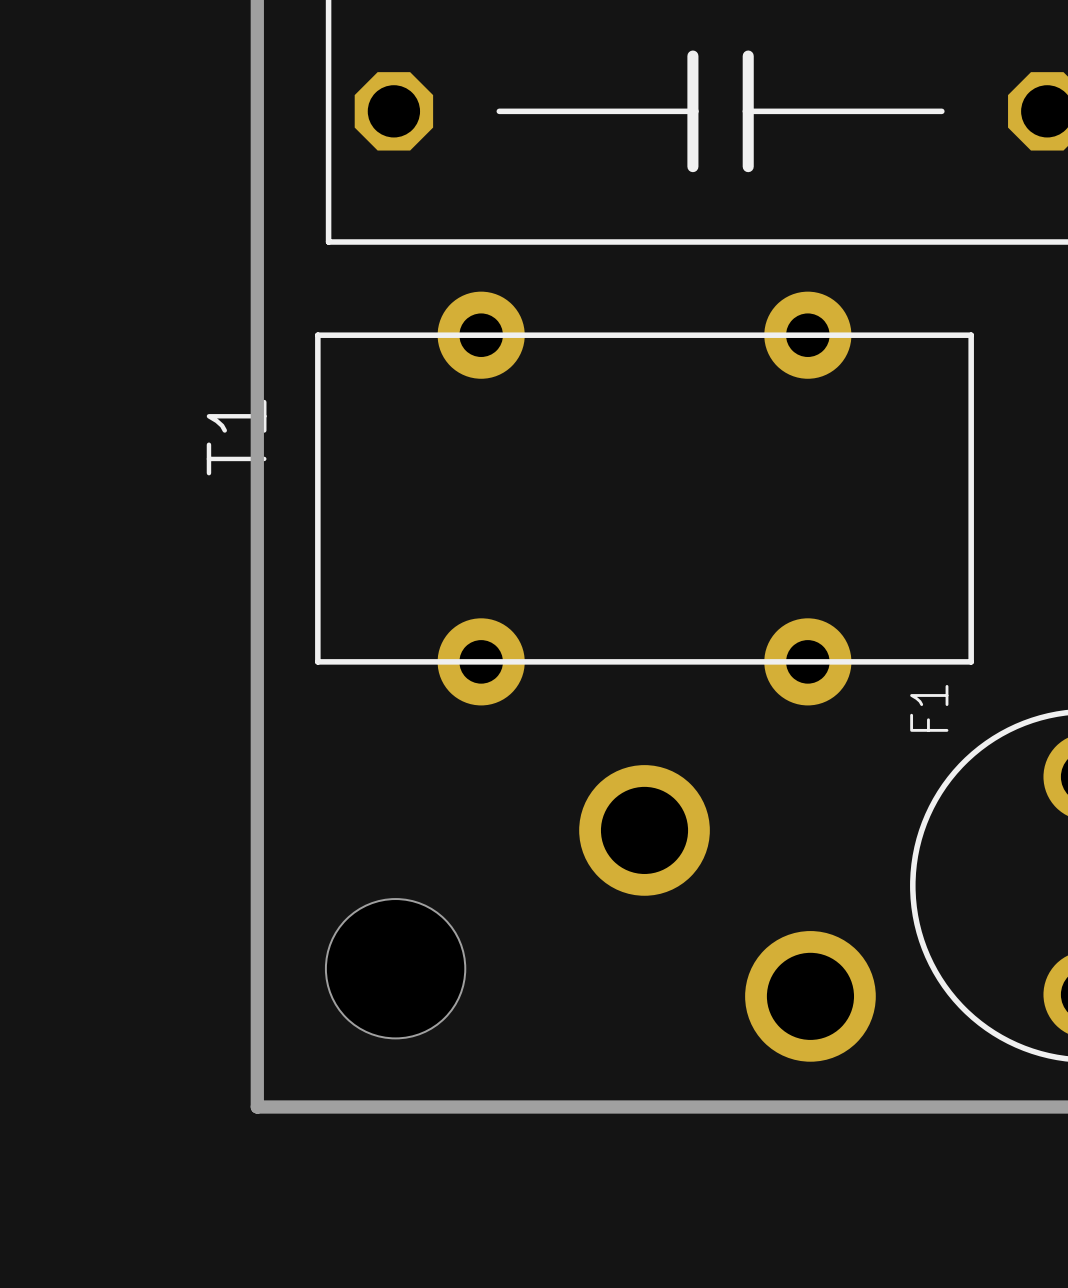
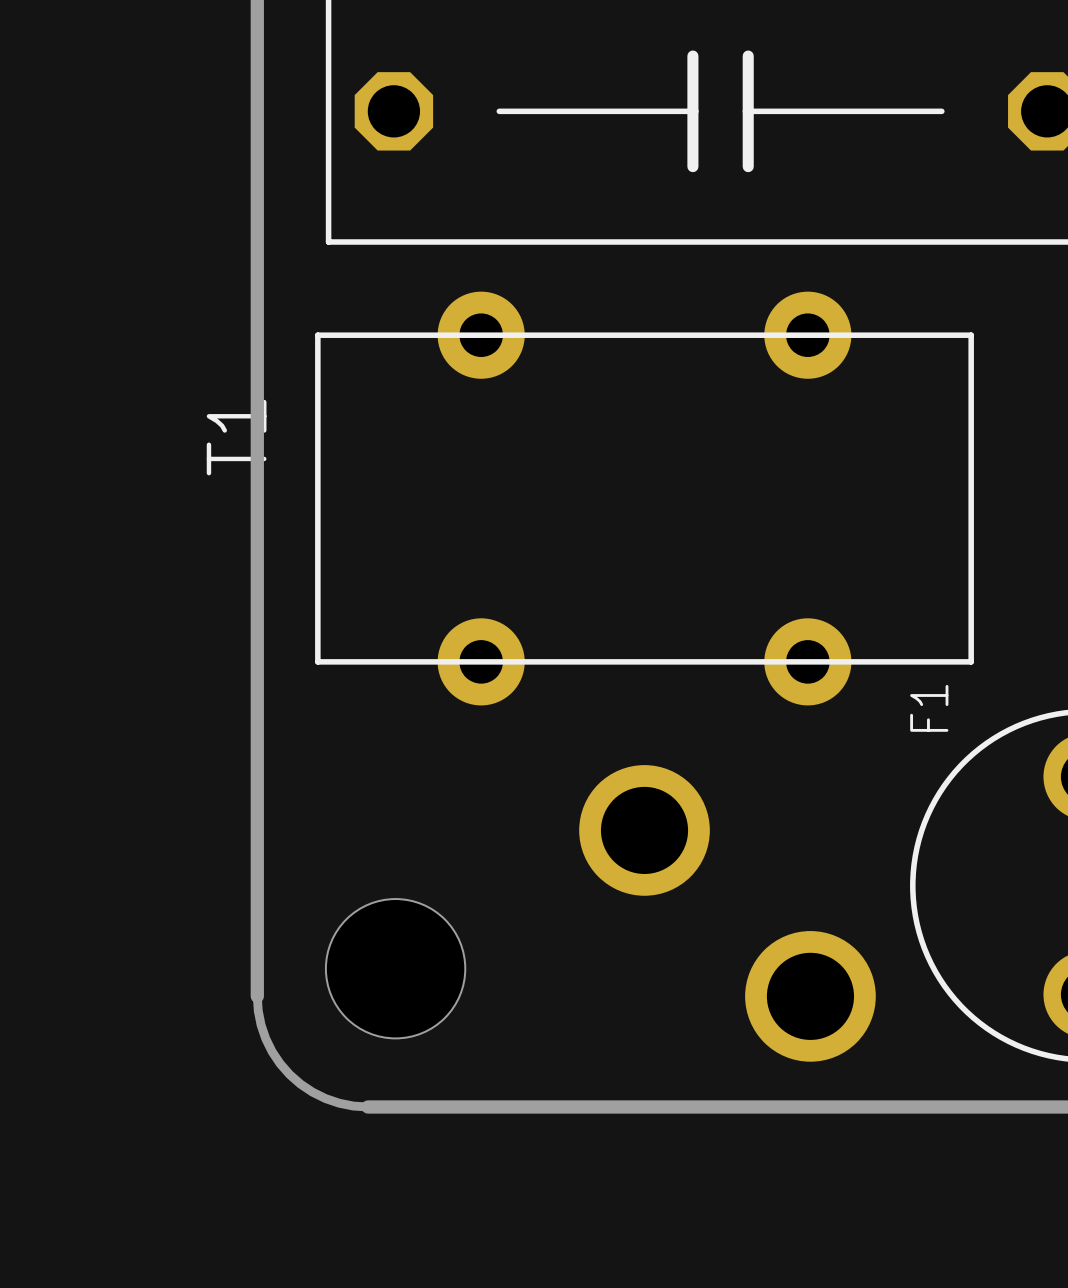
board edge: (257, 996) (257, 1107) (367, 1107) -> (257, 996) (261, 1025) (265, 1038) (280, 1063) (289, 1074) (300, 1084) (325, 1098) (339, 1103) (367, 1107)

